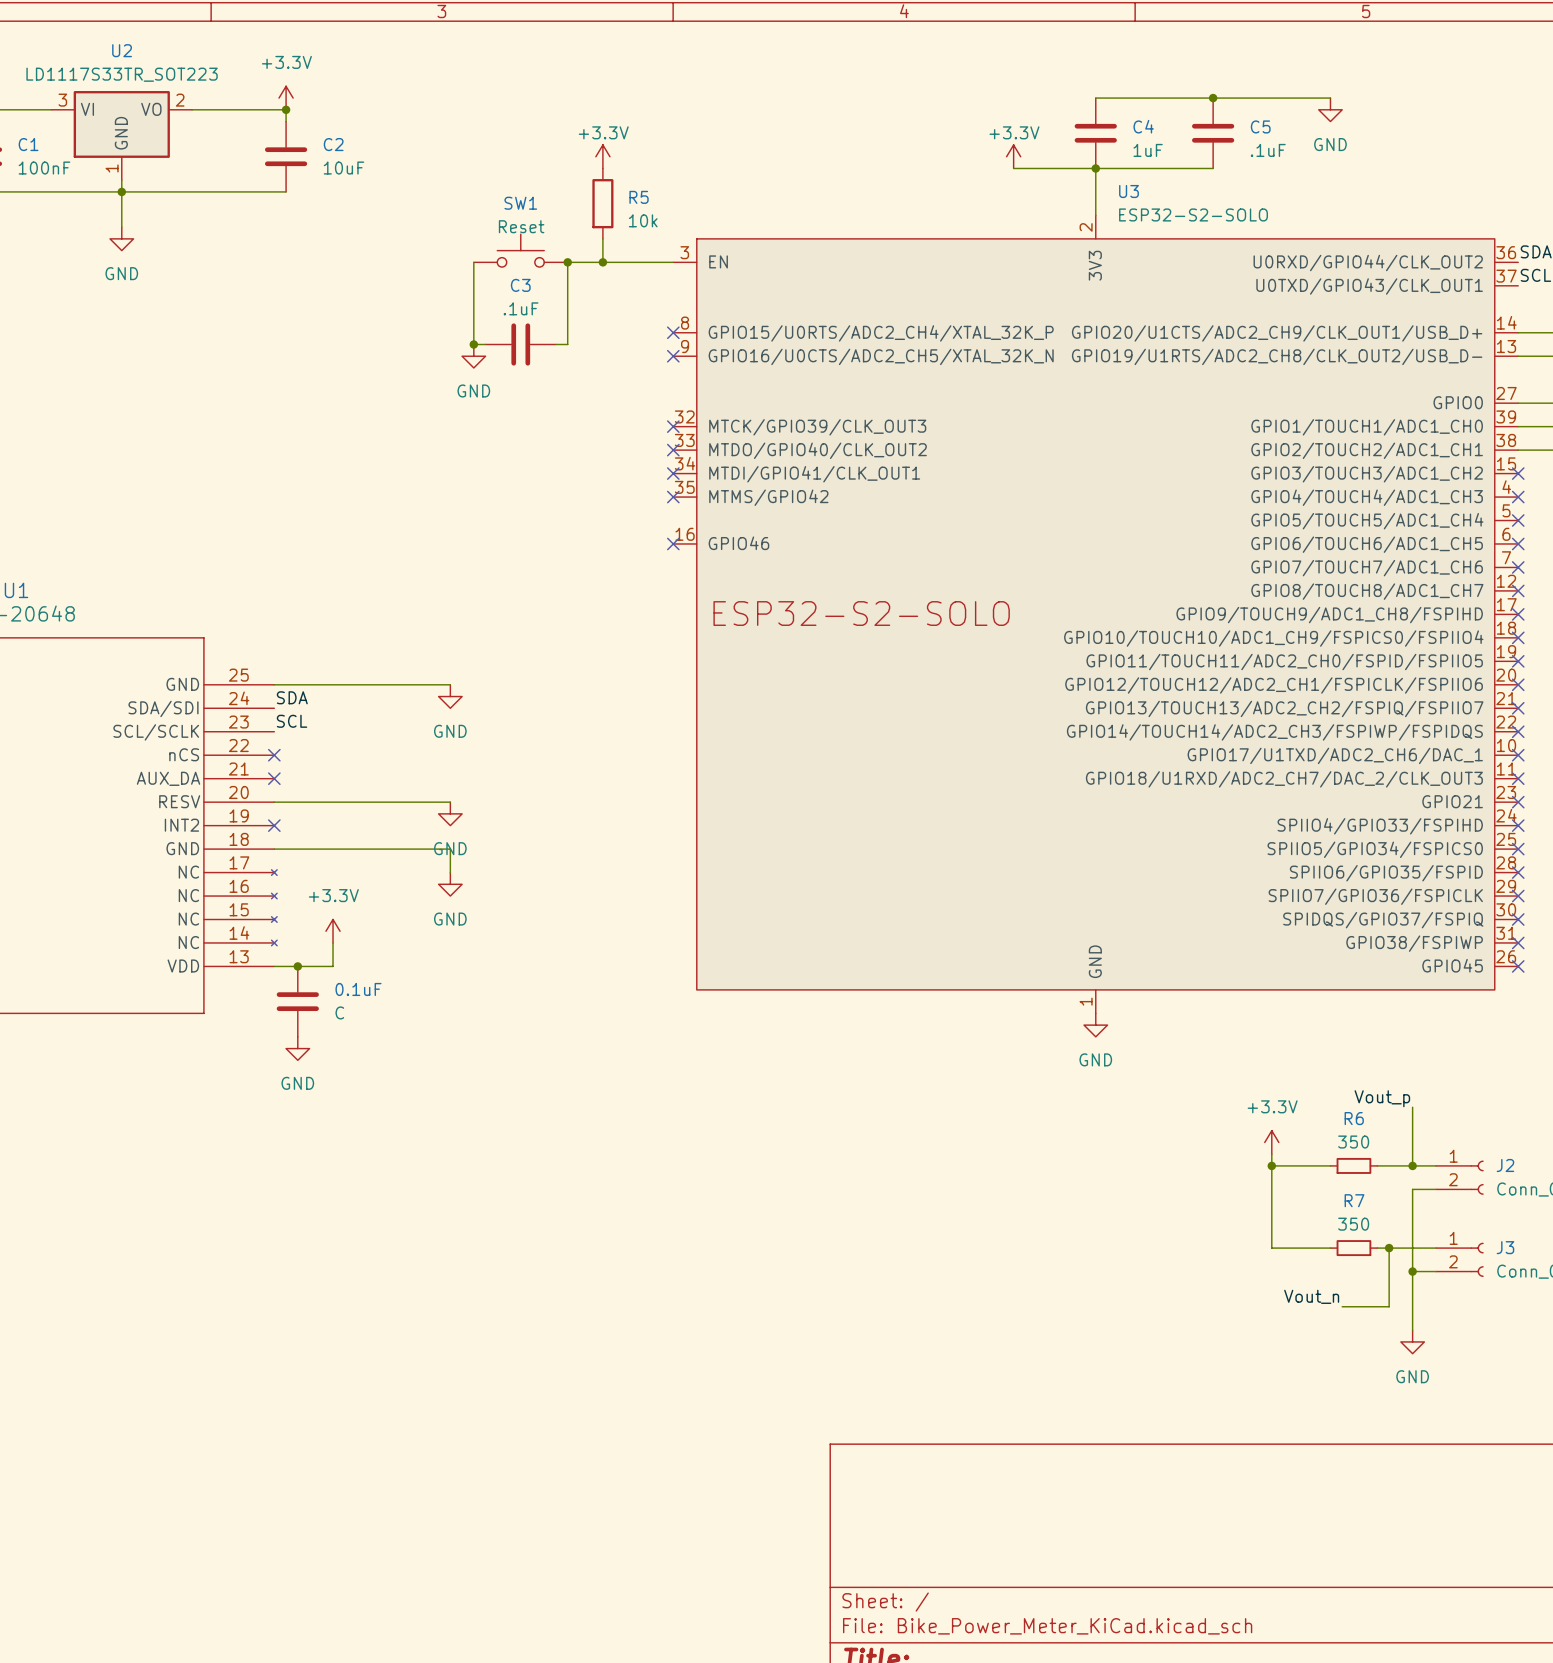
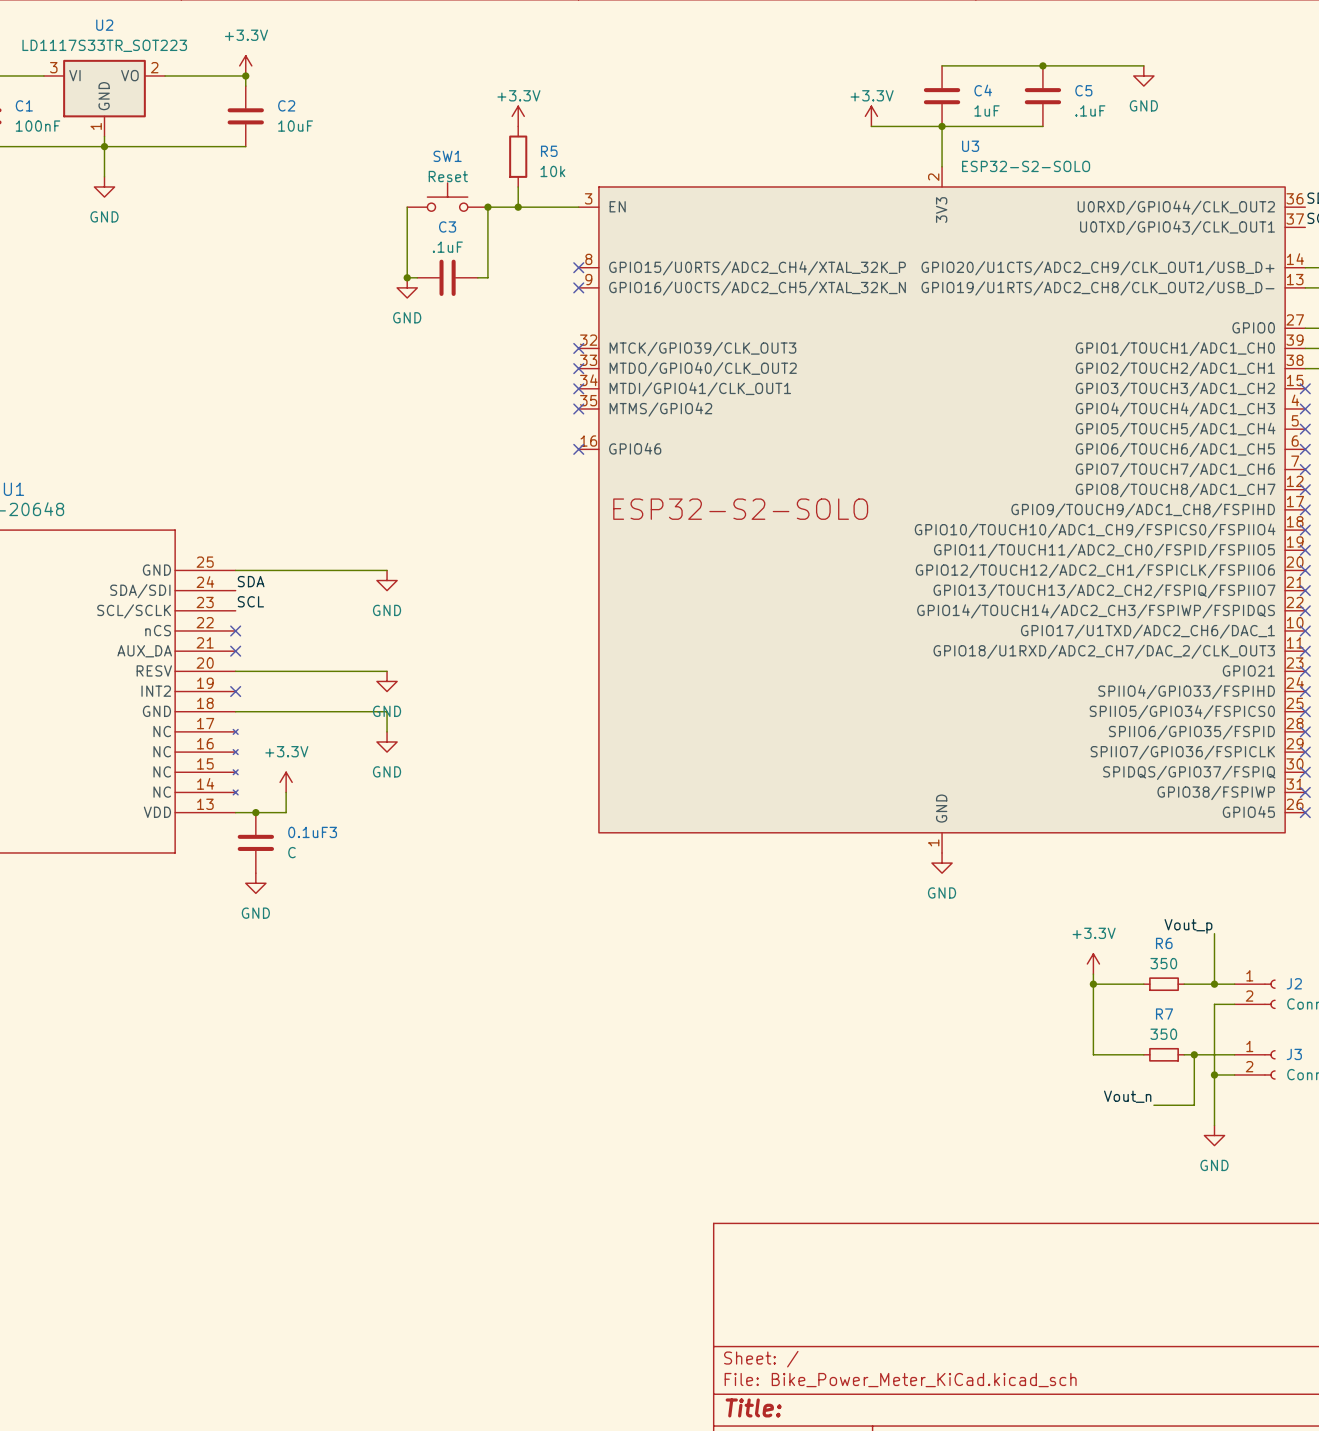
0.1uF name: 0.1uF (358, 989) -> 0.1uF3 (312, 832)

